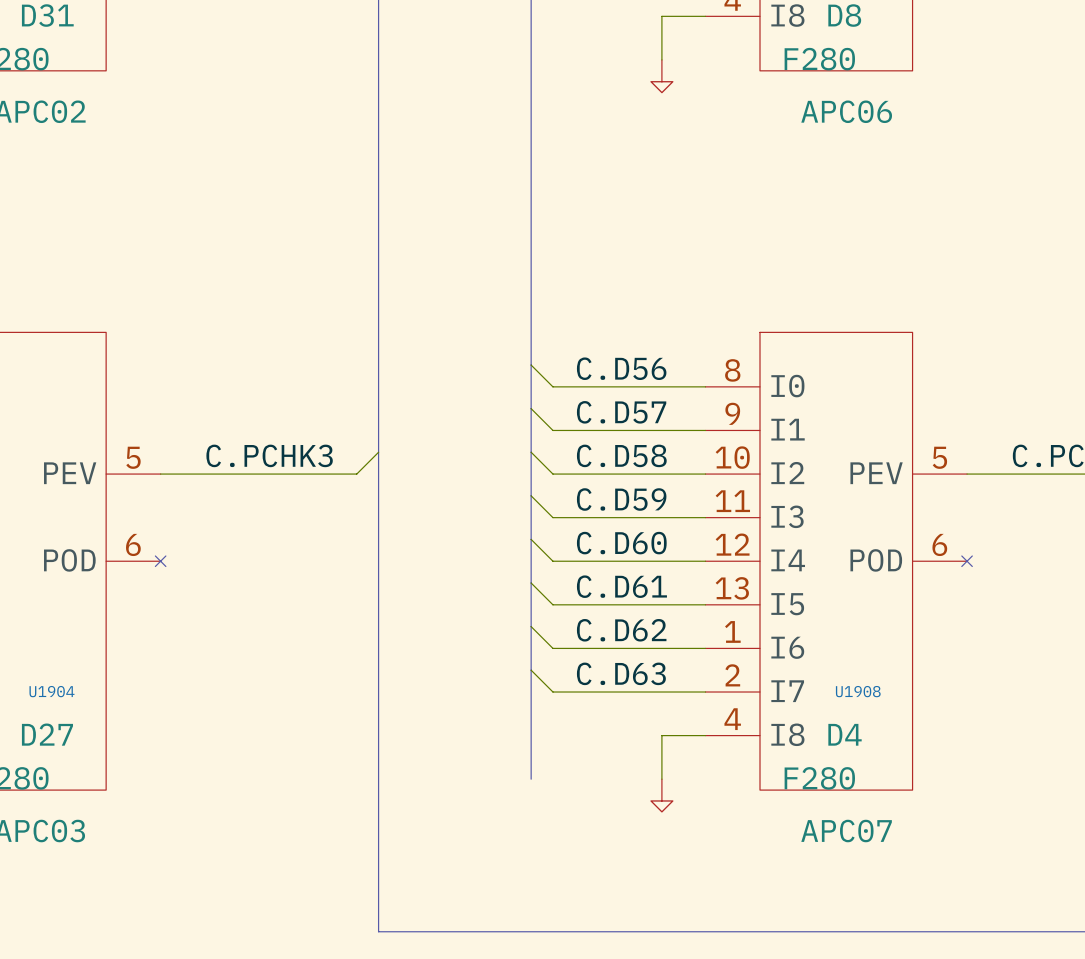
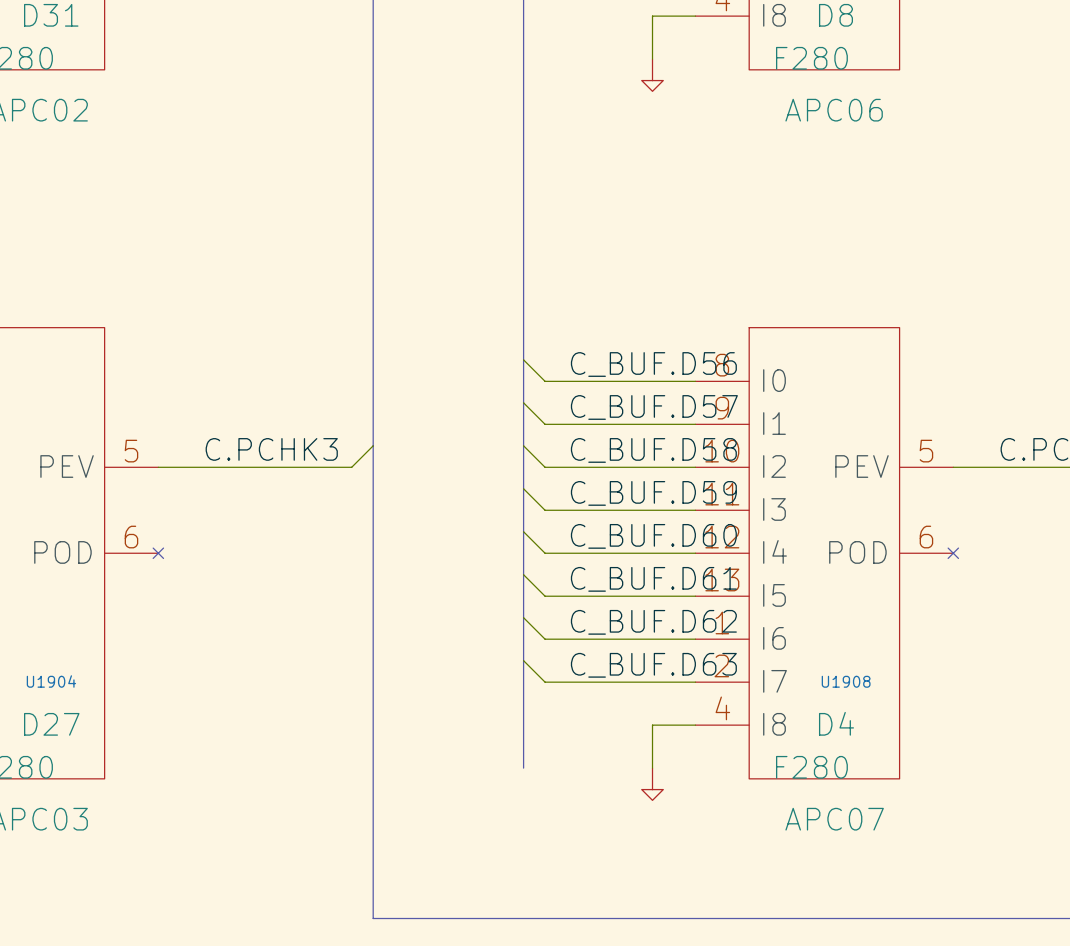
label: C.D56 (621, 368) -> C_BUF.D56 (653, 364)
label: C.D57 (621, 412) -> C_BUF.D57 (654, 407)
label: C.D58 (621, 455) -> C_BUF.D58 (653, 450)
label: C.D59 (621, 499) -> C_BUF.D59 (653, 493)
label: C.D60 (621, 543) -> C_BUF.D60 (653, 536)
label: C.D61 (621, 586) -> C_BUF.D61 (653, 579)
label: C.D62 (621, 630) -> C_BUF.D62 (653, 622)
label: C.D63 (621, 673) -> C_BUF.D63 (653, 665)

